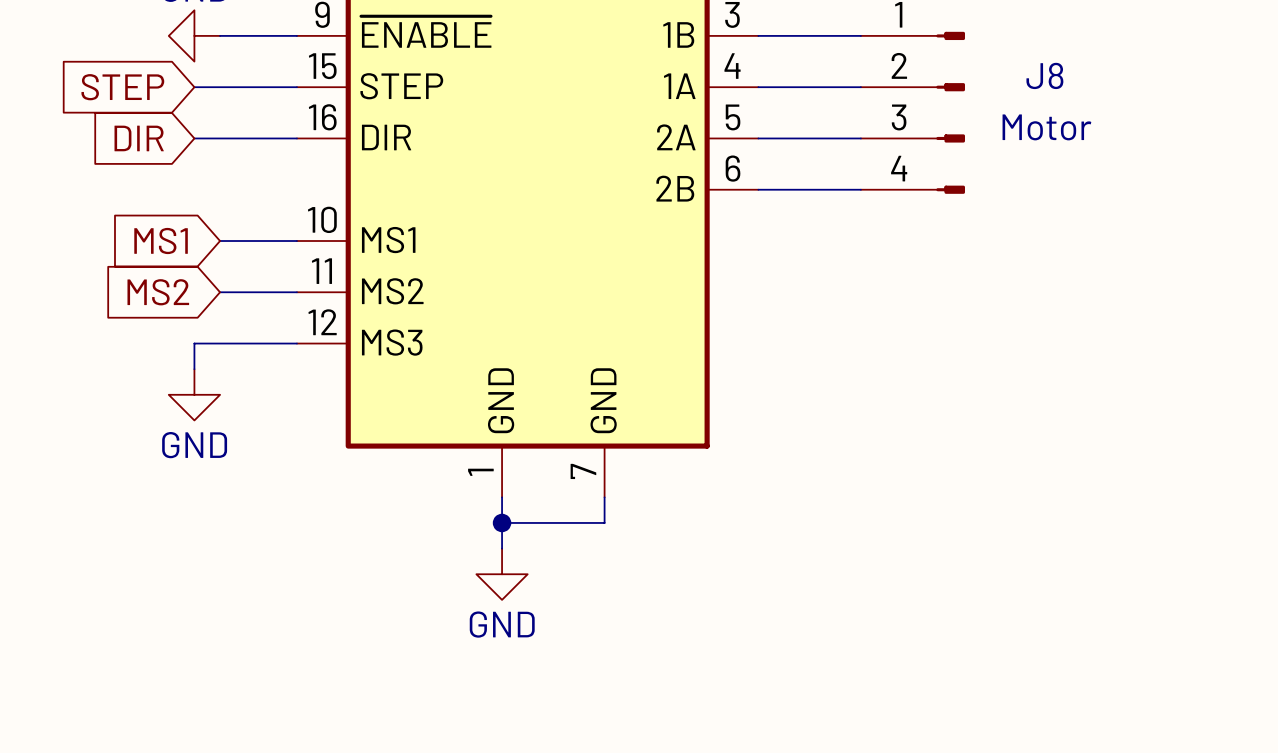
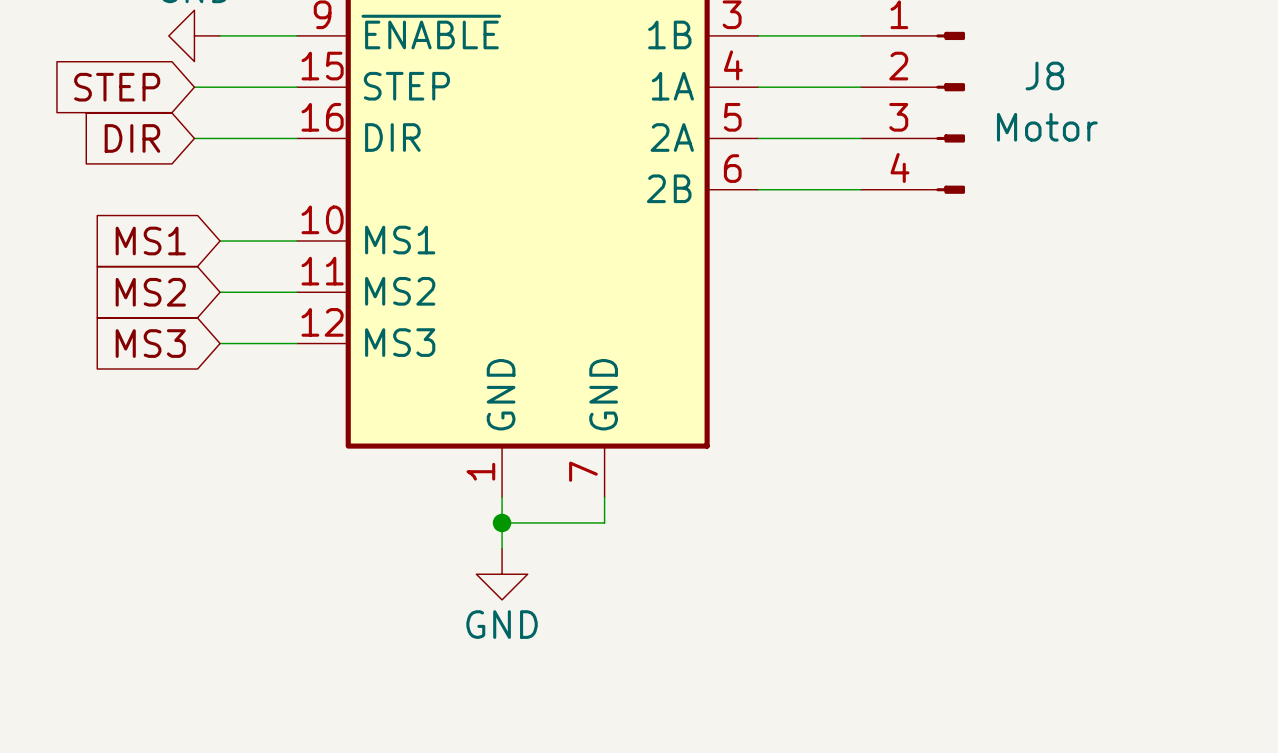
global label: none -> MS3 (150, 343)
wire: (220, 343) (194, 343) (194, 369) -> none
power symbol: GND (194, 394) -> none

